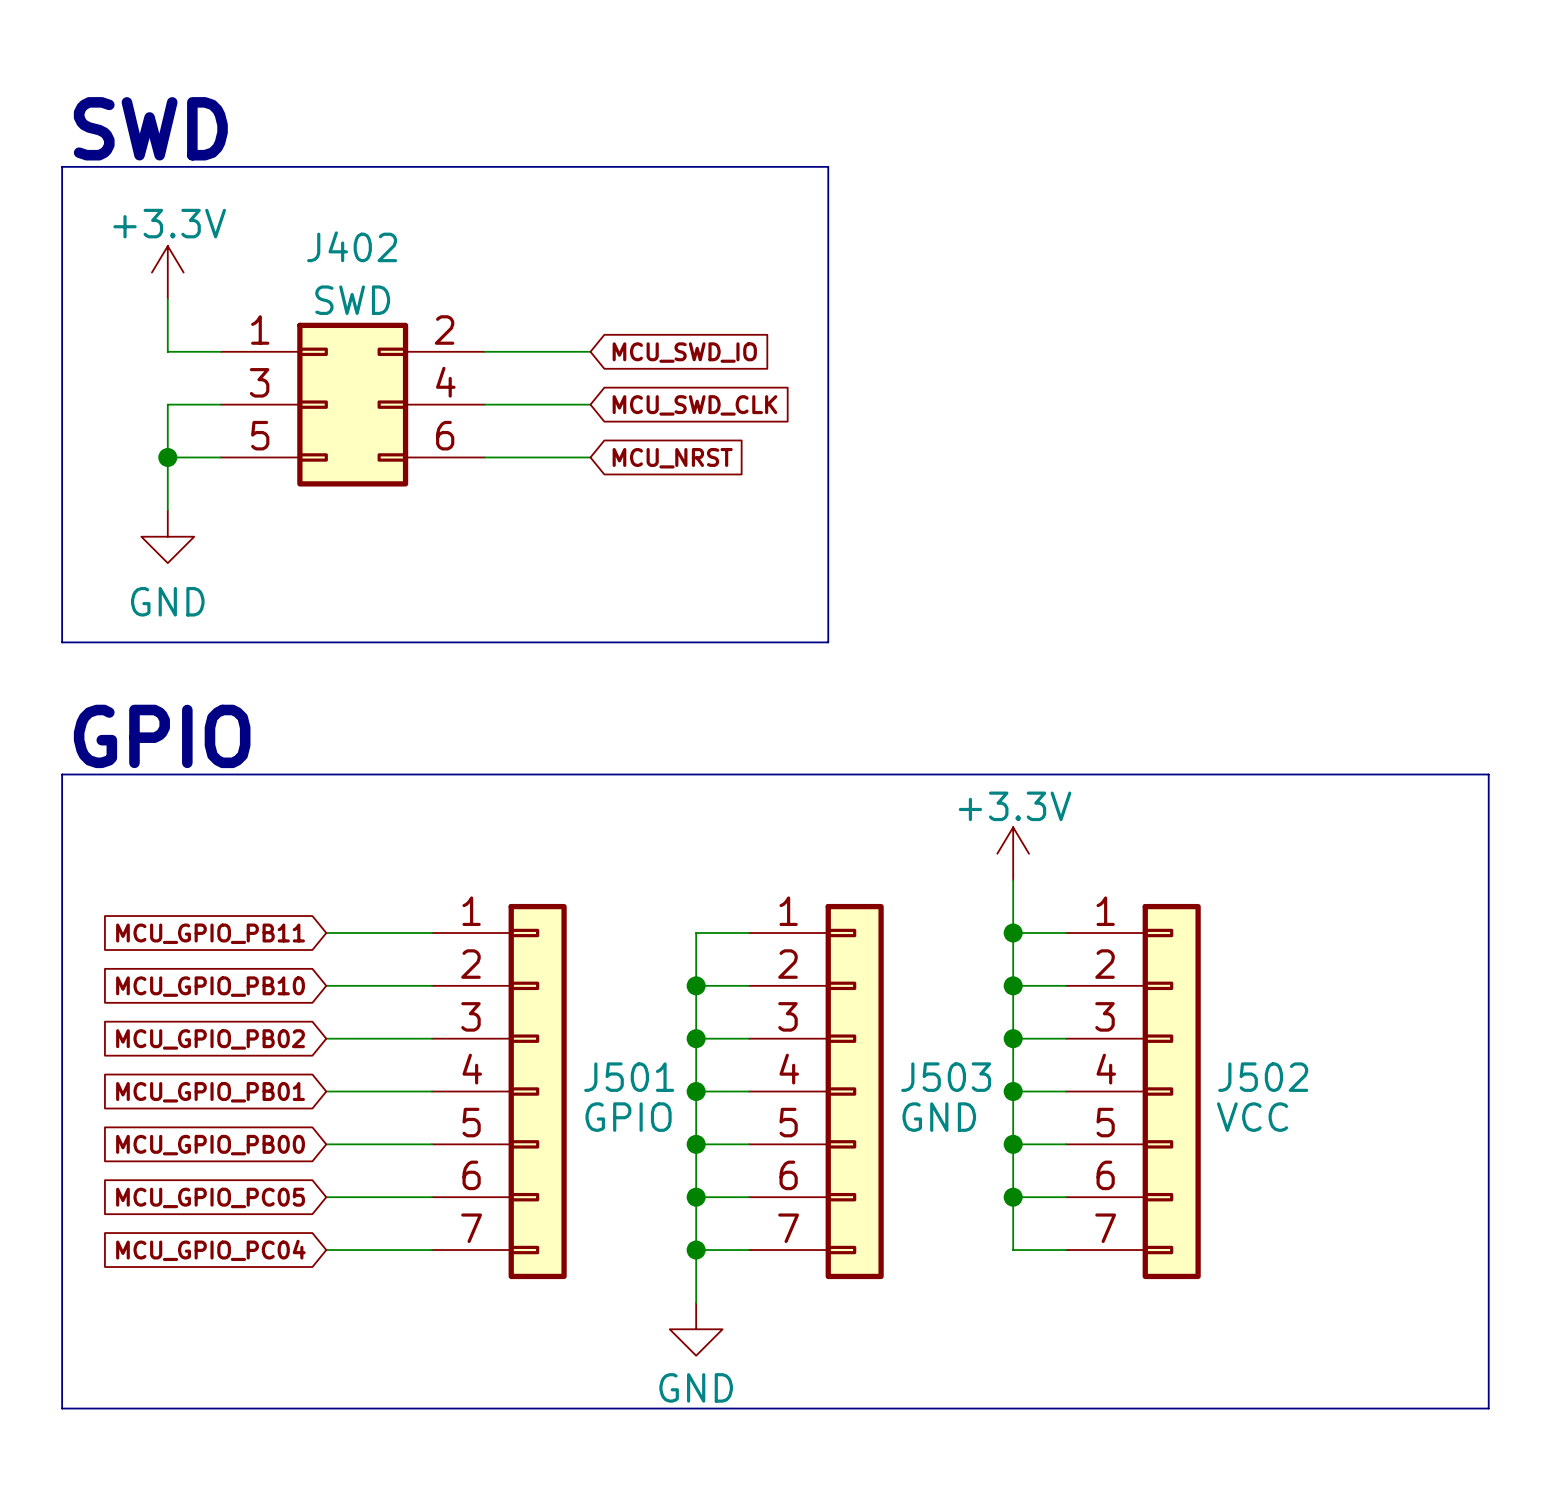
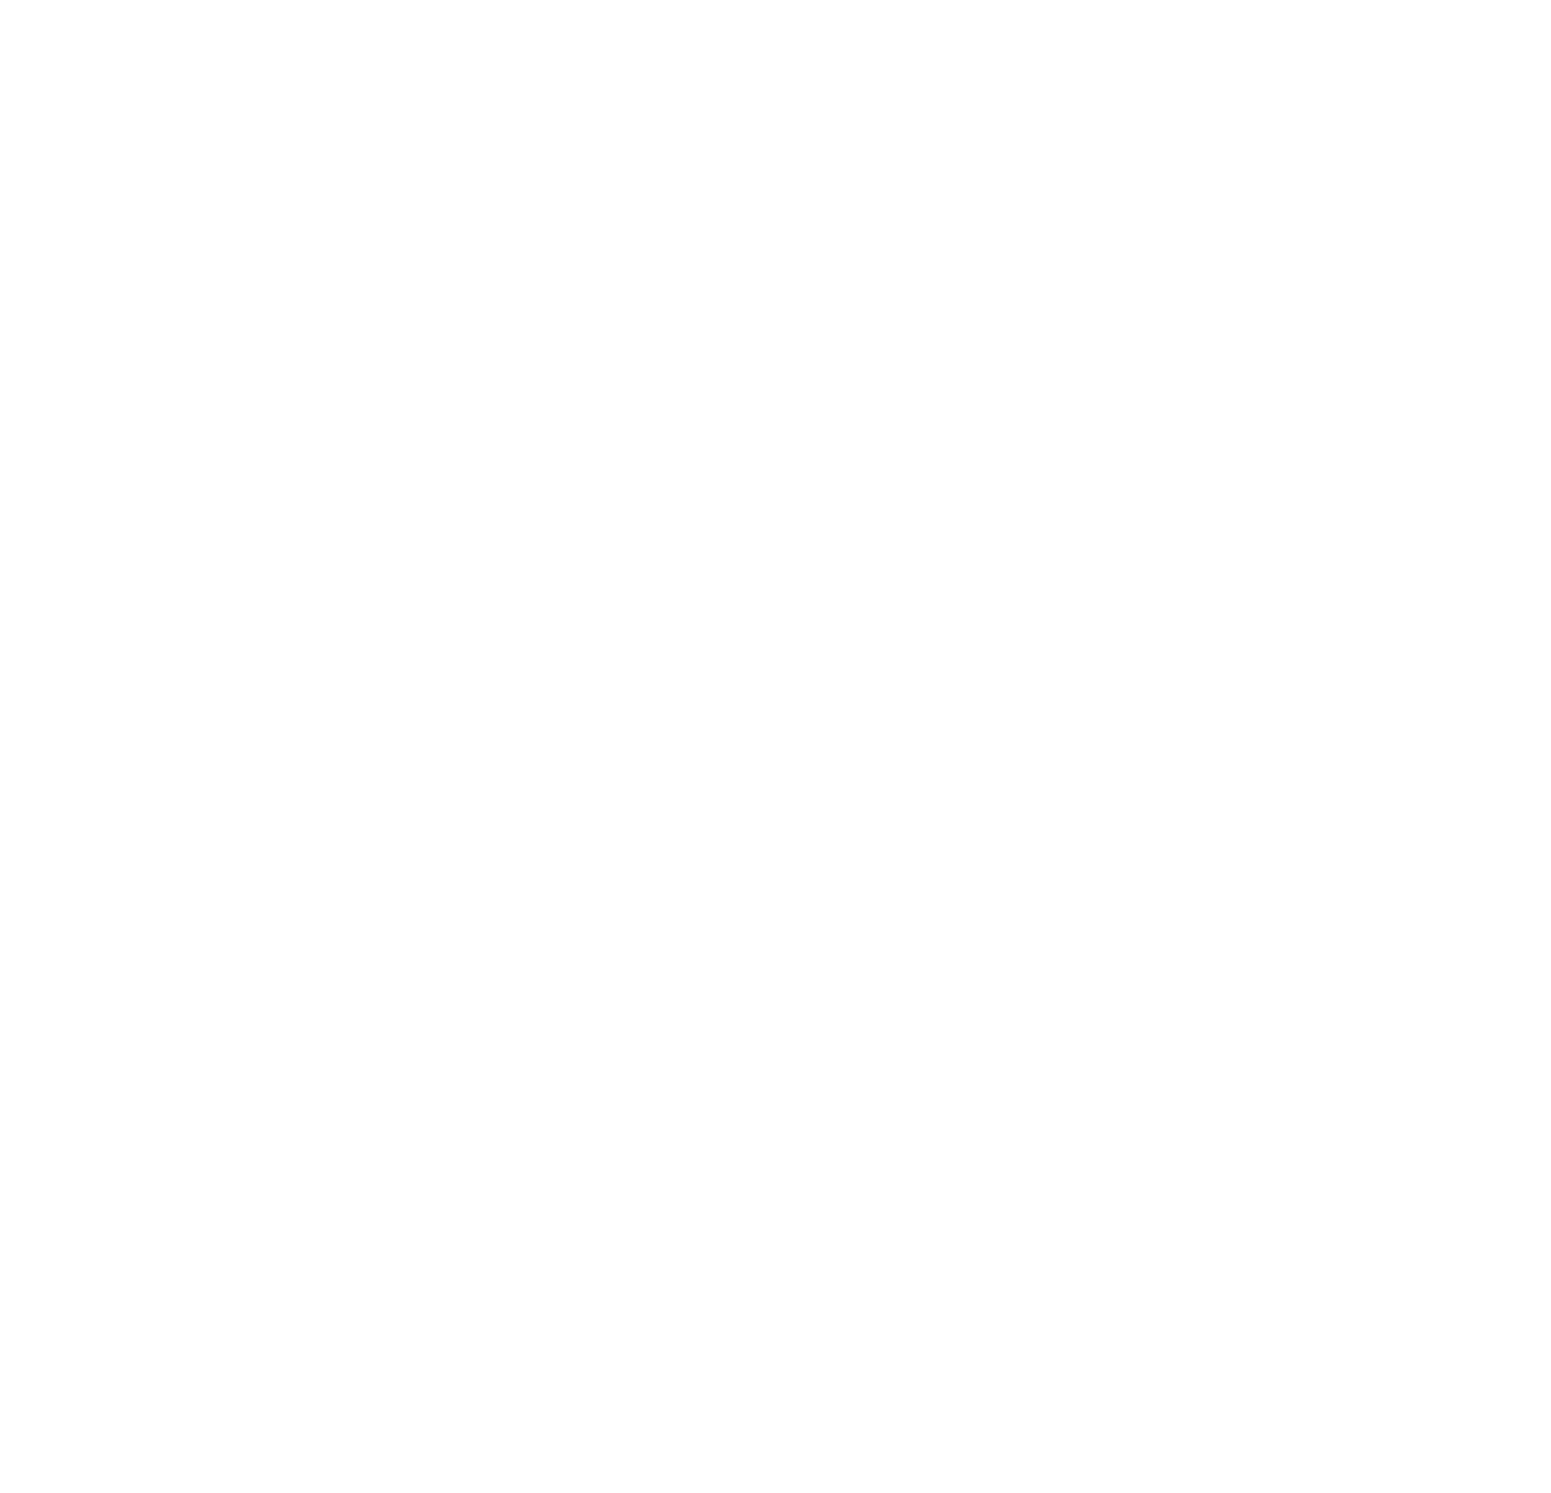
text: SWD (150, 128) -> none
line: (62, 166) (828, 166) (828, 642) (62, 642) (62, 166) -> none
power symbol: +3.3V (167, 272) -> none
wire: (167, 298) (167, 351) (220, 351) -> none
wire: (484, 351) (590, 351) -> none
global label: MCU_SWD_IO (684, 352) -> none
wire: (220, 404) (167, 404) (167, 510) -> none
J402: SWD (352, 404) -> none
wire: (484, 404) (590, 404) -> none
global label: MCU_SWD_CLK (694, 405) -> none
wire: (167, 457) (220, 457) -> none
junction: (167, 457) -> none
wire: (484, 457) (590, 457) -> none
global label: MCU_NRST (672, 458) -> none
power symbol: GND (167, 536) -> none
text: GPIO (162, 736) -> none
line: (62, 774) (62, 1408) (1488, 1408) (1488, 774) (62, 774) -> none
power symbol: +3.3V (1013, 853) -> none
wire: (1013, 880) (1013, 1250) (1066, 1250) -> none
global label: MCU_GPIO_PB11 (210, 933) -> none
wire: (326, 933) (431, 933) -> none
wire: (748, 933) (696, 933) (696, 1302) -> none
wire: (1013, 933) (1066, 933) -> none
junction: (1013, 933) -> none
wire: (326, 985) (431, 985) -> none
wire: (696, 985) (748, 985) -> none
junction: (696, 985) -> none
wire: (1013, 985) (1066, 985) -> none
junction: (1013, 985) -> none
global label: MCU_GPIO_PB10 (210, 986) -> none
wire: (326, 1038) (431, 1038) -> none
wire: (696, 1038) (748, 1038) -> none
junction: (696, 1038) -> none
wire: (1013, 1038) (1066, 1038) -> none
junction: (1013, 1038) -> none
global label: MCU_GPIO_PB02 (210, 1039) -> none
wire: (326, 1091) (431, 1091) -> none
J501: GPIO (499, 1091) -> none
wire: (696, 1091) (748, 1091) -> none
junction: (696, 1091) -> none
J503: GND (816, 1091) -> none
wire: (1013, 1091) (1066, 1091) -> none
junction: (1013, 1091) -> none
J502: VCC (1133, 1091) -> none
global label: MCU_GPIO_PB01 (210, 1092) -> none
wire: (326, 1144) (431, 1144) -> none
wire: (696, 1144) (748, 1144) -> none
junction: (696, 1144) -> none
wire: (1013, 1144) (1066, 1144) -> none
junction: (1013, 1144) -> none
global label: MCU_GPIO_PB00 (210, 1145) -> none
global label: MCU_GPIO_PC05 (210, 1197) -> none
wire: (326, 1197) (431, 1197) -> none
wire: (696, 1197) (748, 1197) -> none
junction: (696, 1197) -> none
wire: (1013, 1197) (1066, 1197) -> none
junction: (1013, 1197) -> none
global label: MCU_GPIO_PC04 (210, 1250) -> none
wire: (326, 1250) (431, 1250) -> none
wire: (696, 1250) (748, 1250) -> none
junction: (696, 1250) -> none
power symbol: GND (696, 1329) -> none

